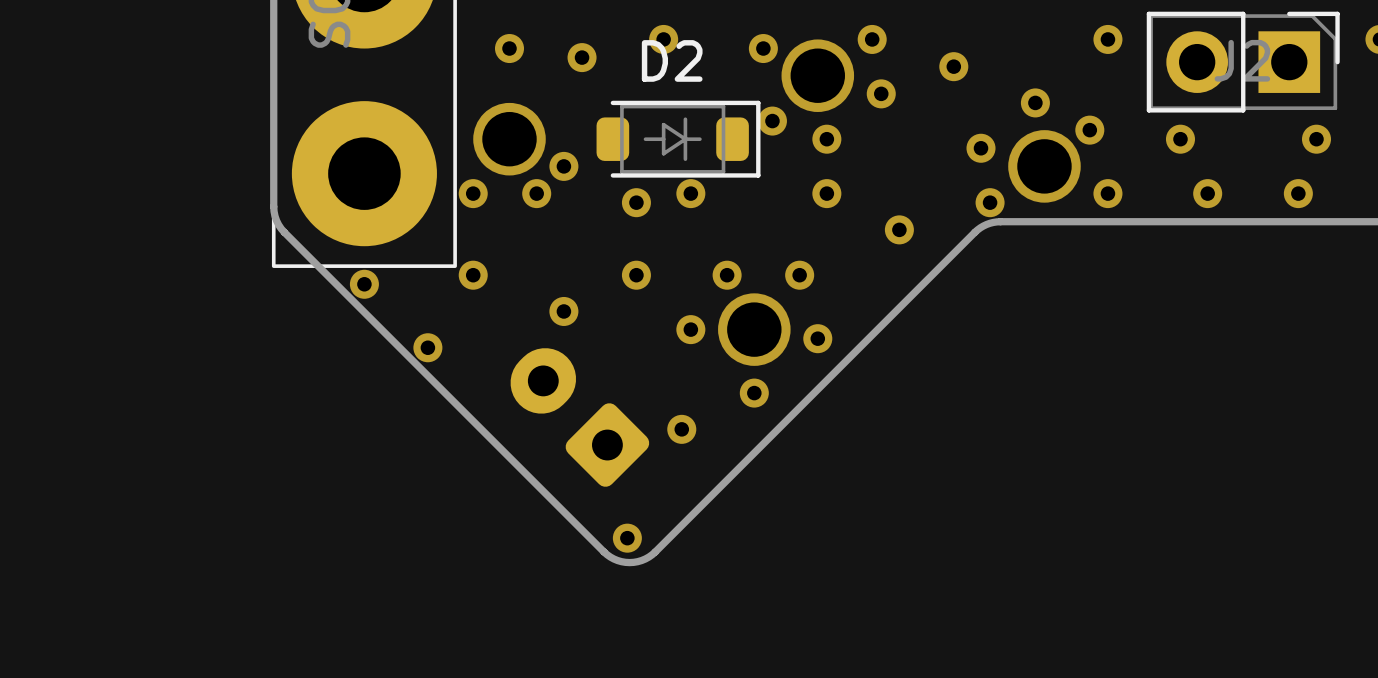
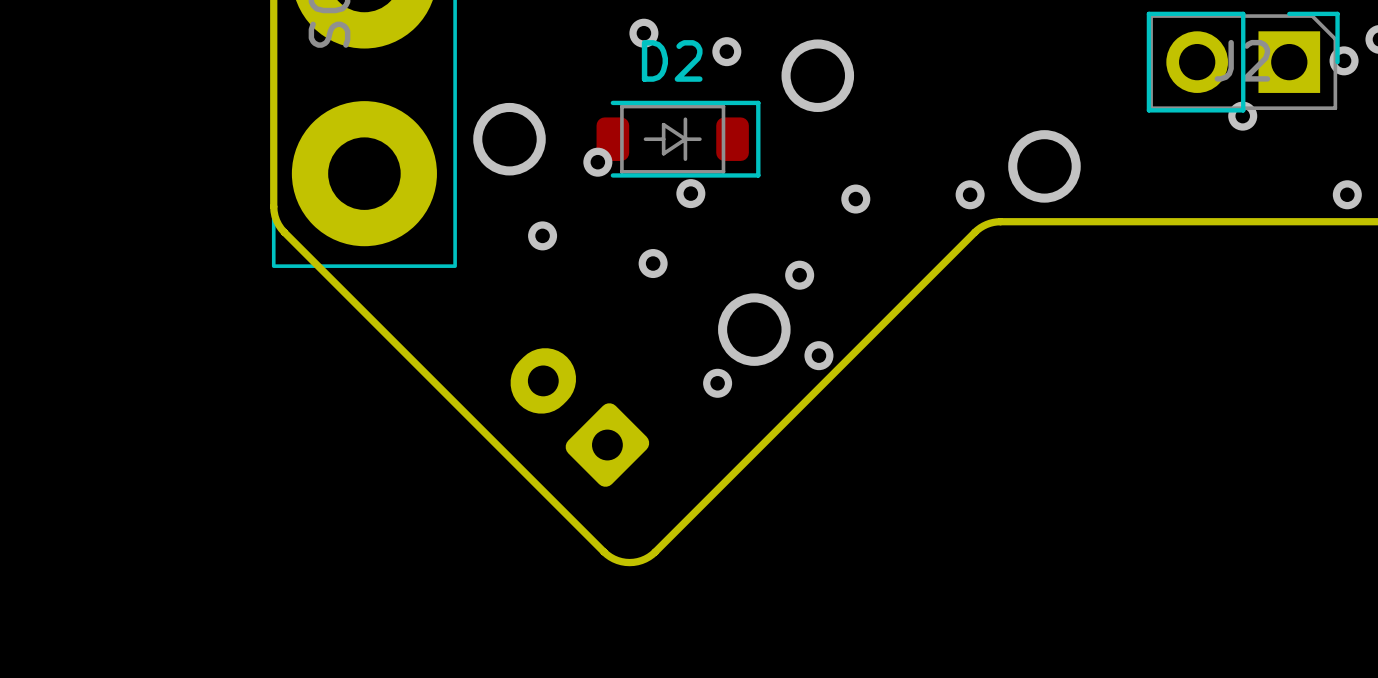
via position: (663, 39) -> (643, 33)
via: (872, 39) -> none
via: (1107, 39) -> none
via: (509, 48) -> none
via: (763, 48) -> none
via: none -> (726, 51)
via: (582, 57) -> none
via: none -> (1344, 60)
via: (953, 66) -> none
via: (881, 93) -> none
via: (1035, 102) -> none
via: none -> (1242, 116)
via: (772, 121) -> none
via: (1089, 130) -> none
via: (826, 139) -> none
via: (1180, 139) -> none
via: (1316, 139) -> none
via: (981, 148) -> none
via: none -> (597, 162)
via: (563, 166) -> none
via: (473, 193) -> none
via: (536, 193) -> none
via position: (826, 193) -> (855, 199)
via: (1107, 193) -> none
via: (1207, 193) -> none
via: (1298, 193) -> none
via: none -> (1347, 194)
via: (636, 202) -> none
via position: (990, 202) -> (970, 194)
via: (899, 229) -> none
via: none -> (542, 235)
via: (473, 275) -> none
via position: (636, 275) -> (653, 263)
via: (727, 275) -> none
via: (364, 284) -> none
via: (563, 311) -> none
via: (690, 329) -> none
via position: (817, 338) -> (818, 355)
via: (427, 347) -> none
via: none -> (717, 383)
via: (754, 393) -> none
via: (681, 429) -> none
via: (627, 538) -> none

